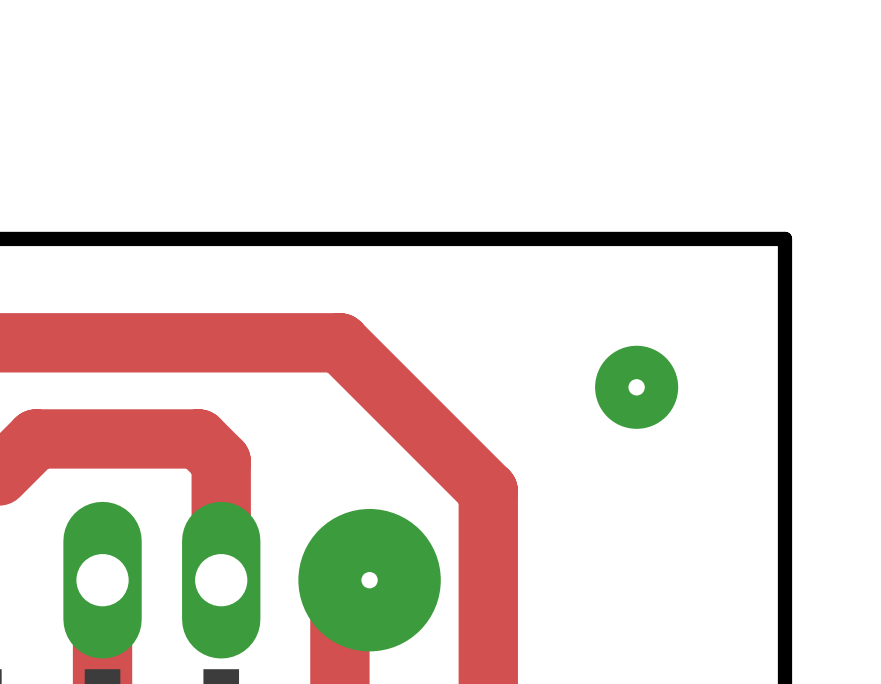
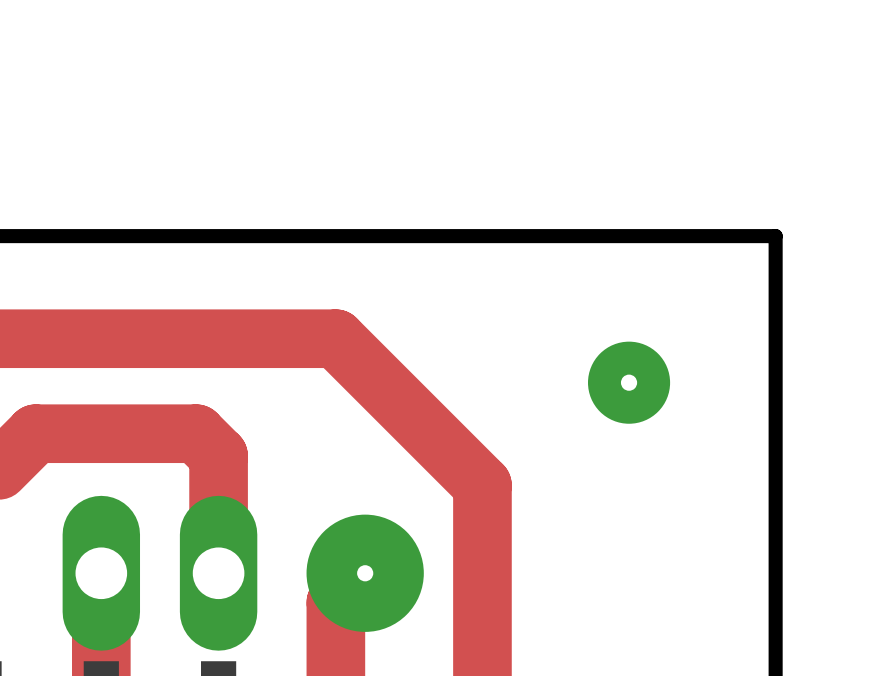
via size: [298, 508, 441, 652] -> [306, 514, 424, 632]

